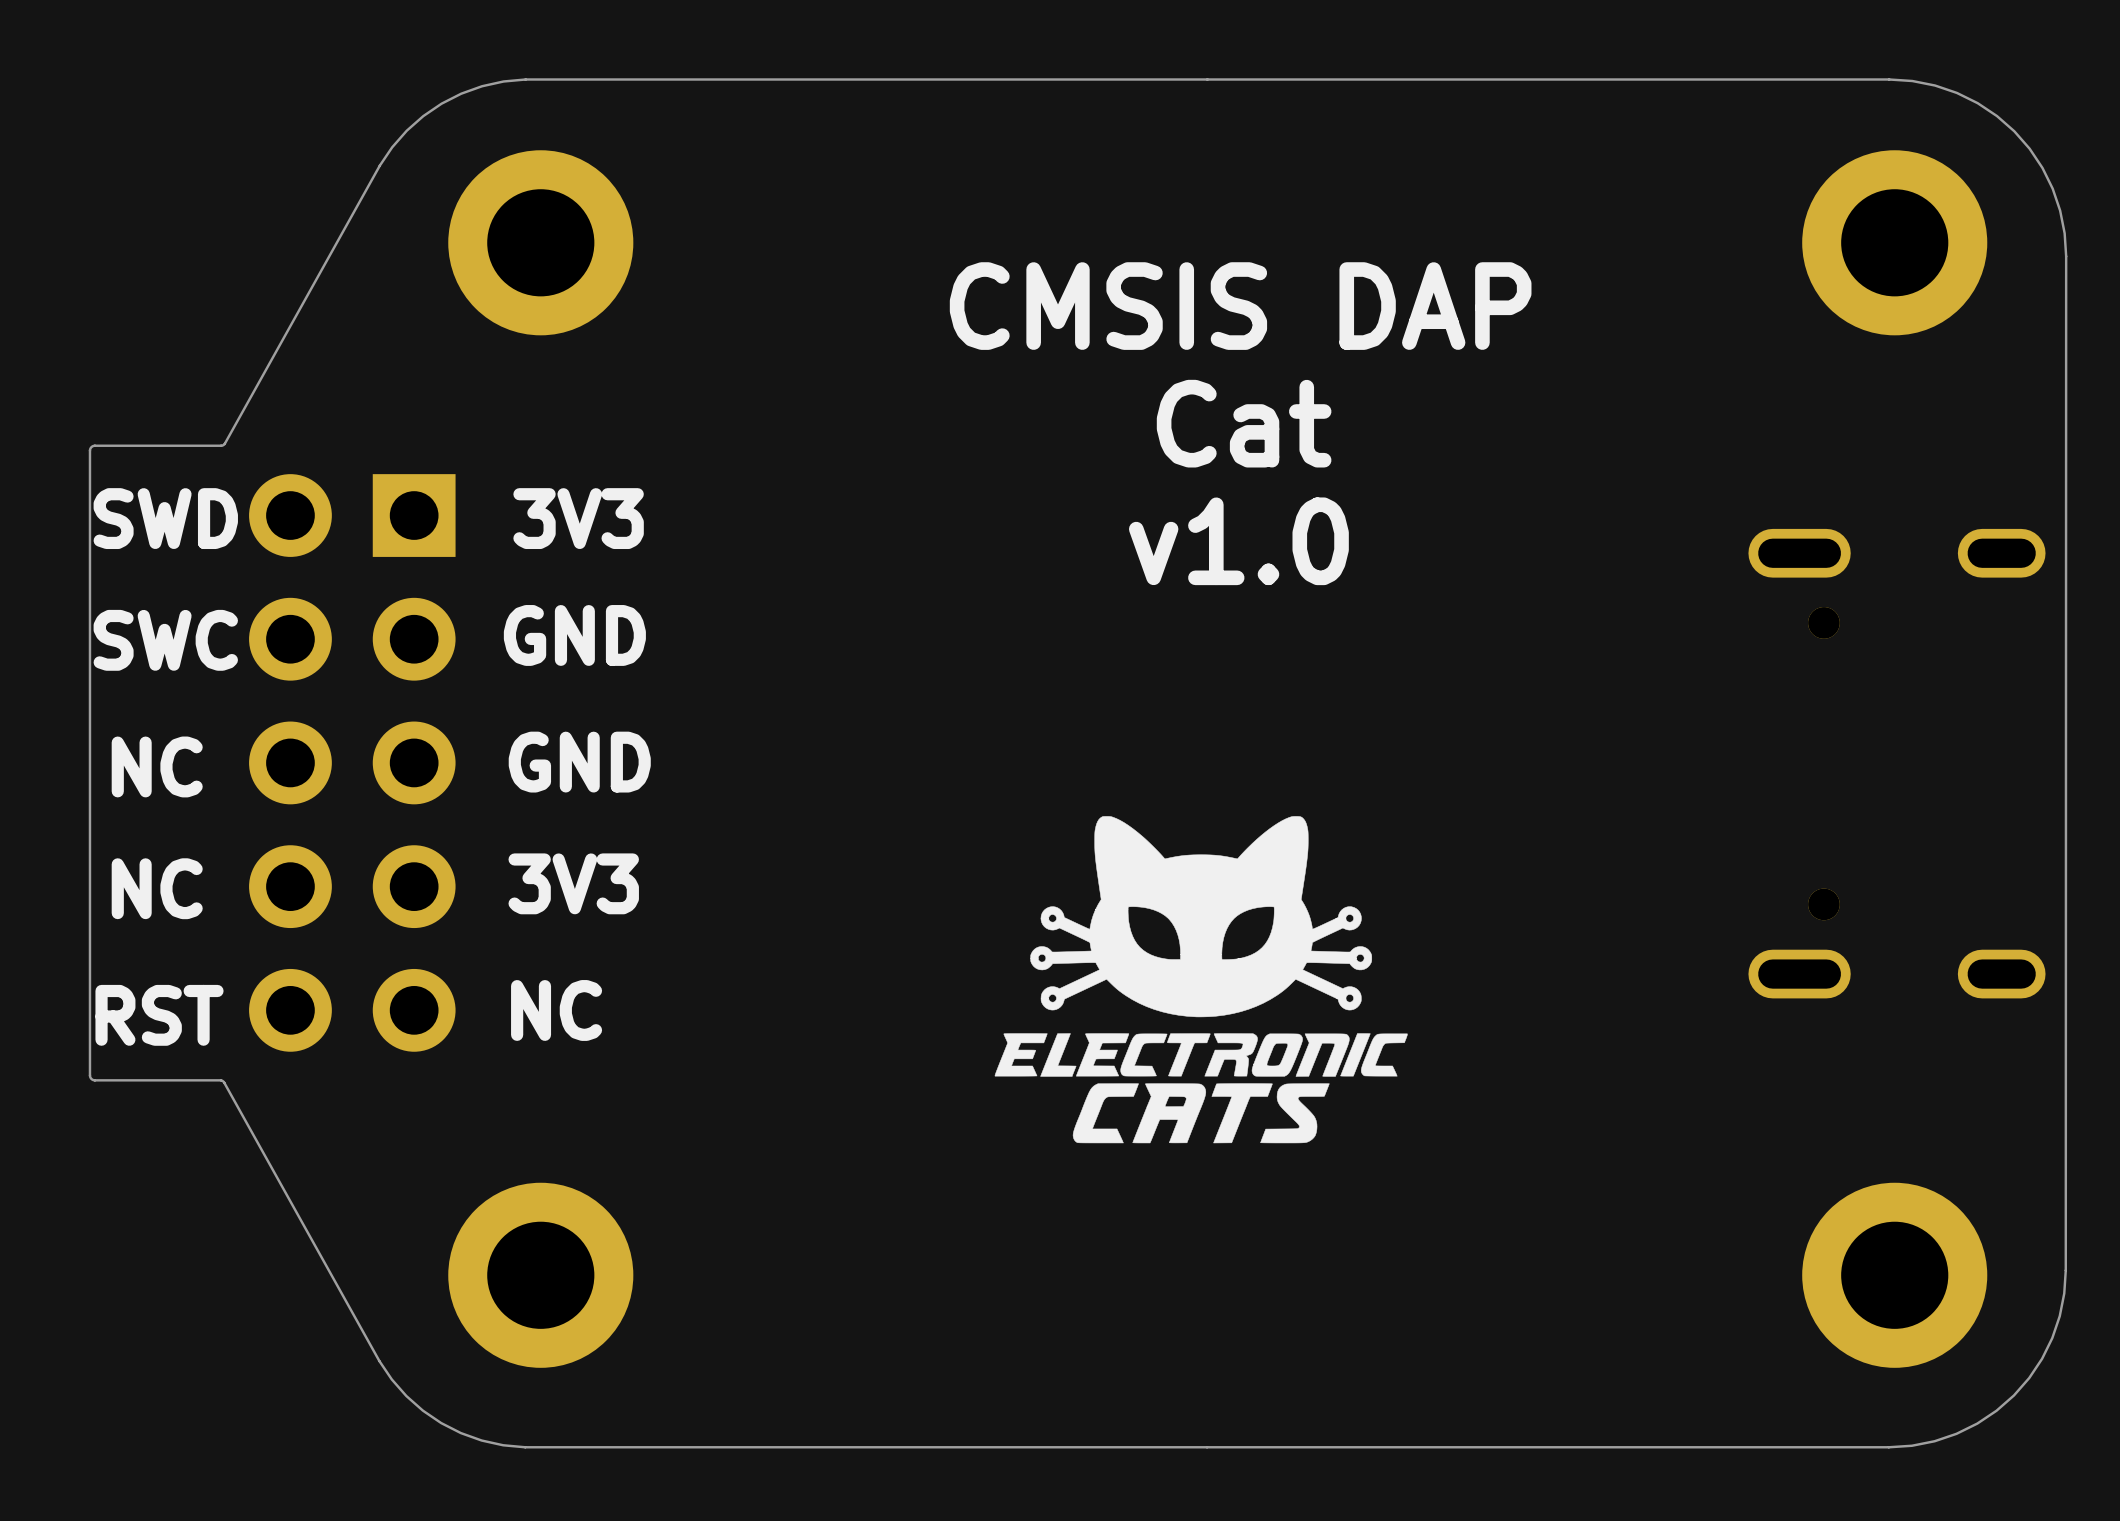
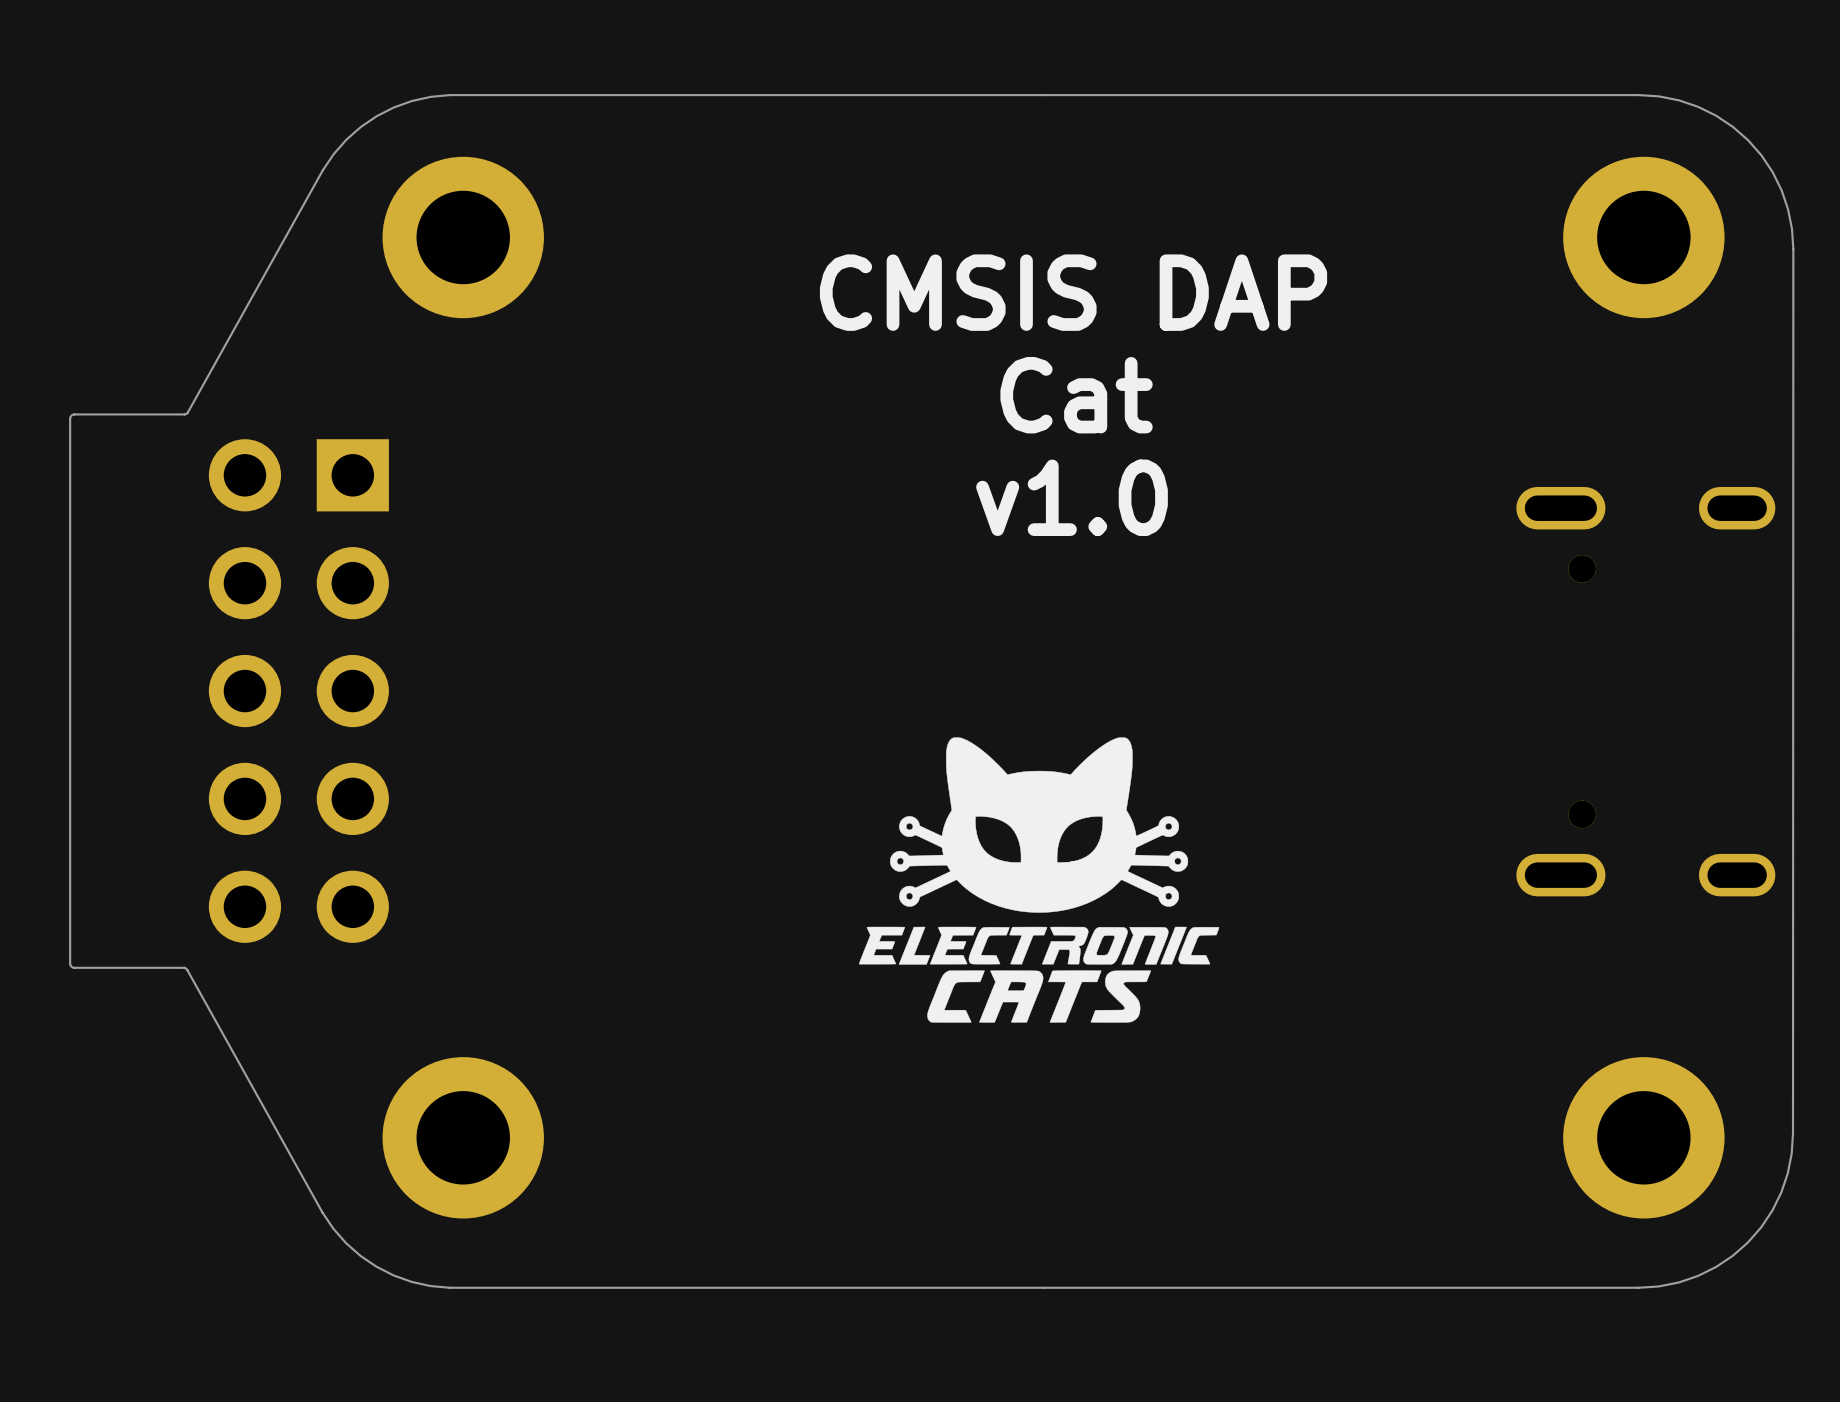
text: SWD (165, 518) -> none
text: 3V3 (578, 518) -> none
text: GND (574, 635) -> none
text: SWC (165, 640) -> none
text: GND (579, 762) -> none
text: NC (157, 766) -> none
text: 3V3 (573, 883) -> none
text: NC (157, 888) -> none
text: NC (556, 1010) -> none
text: RST (159, 1015) -> none

